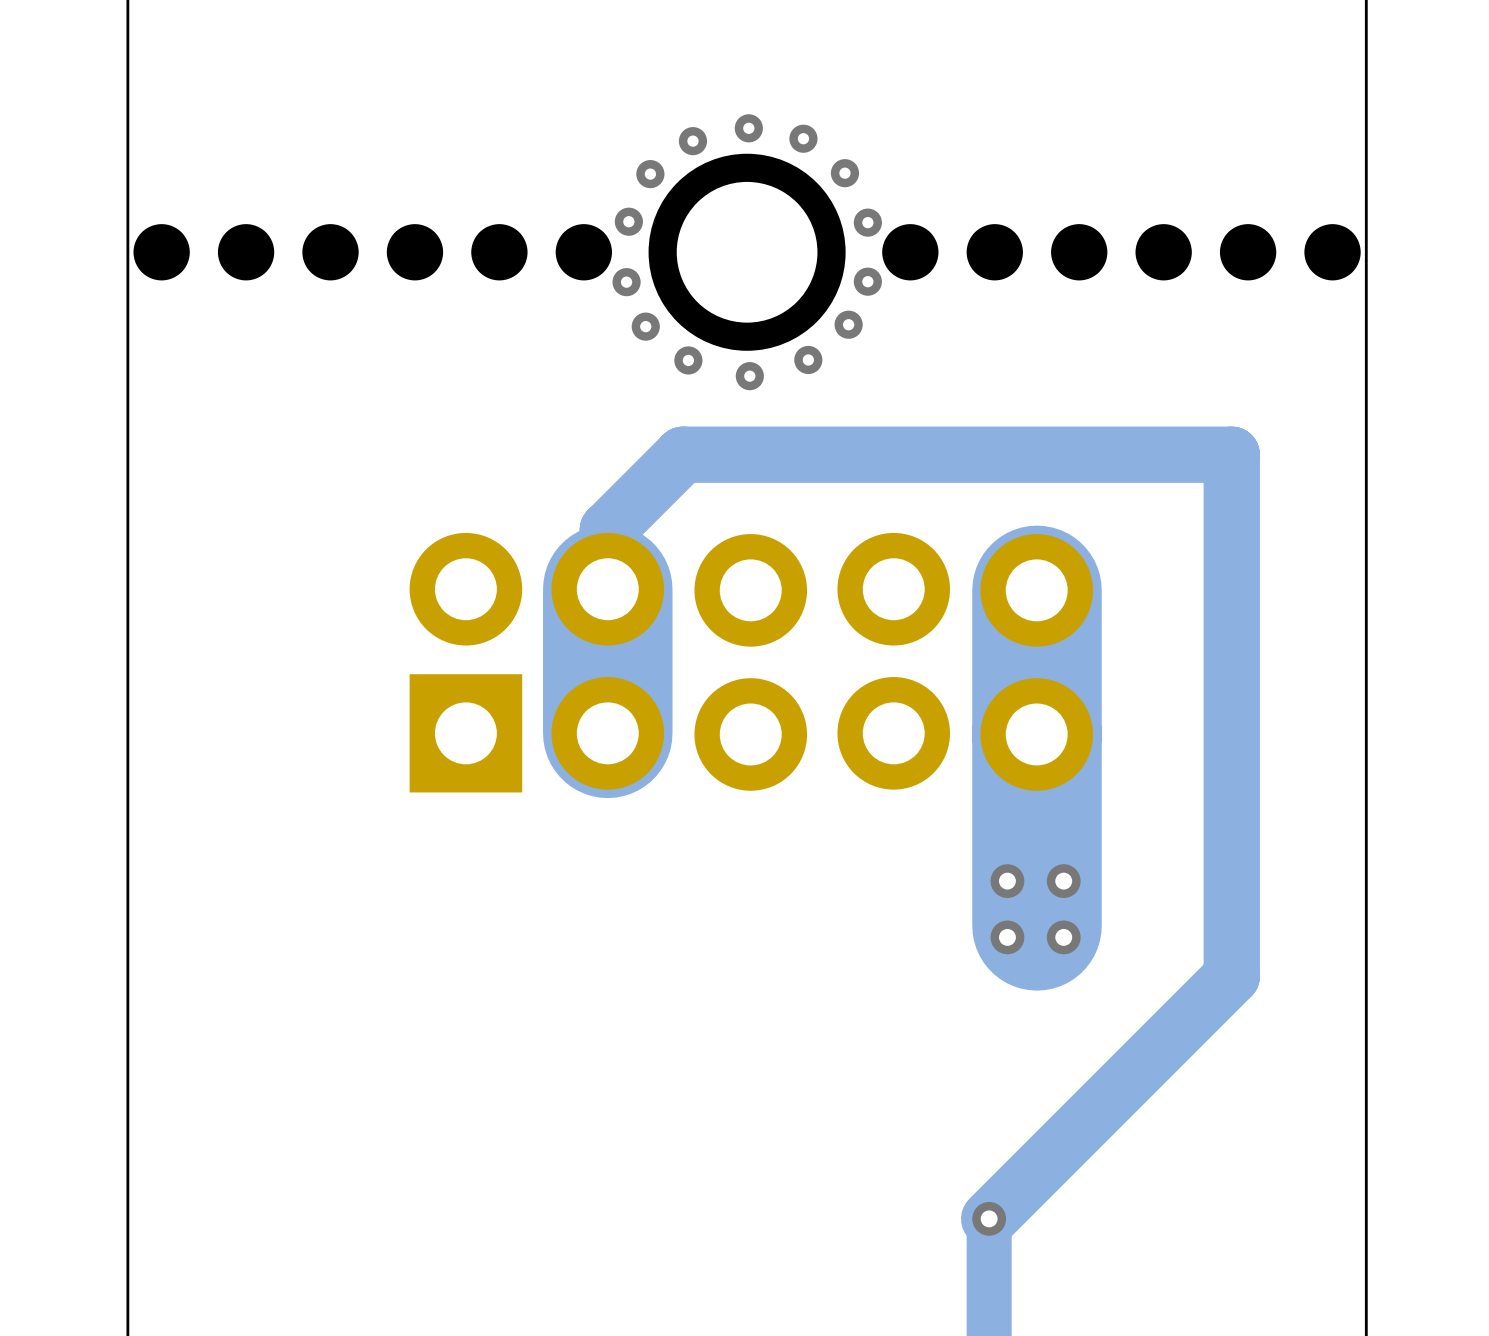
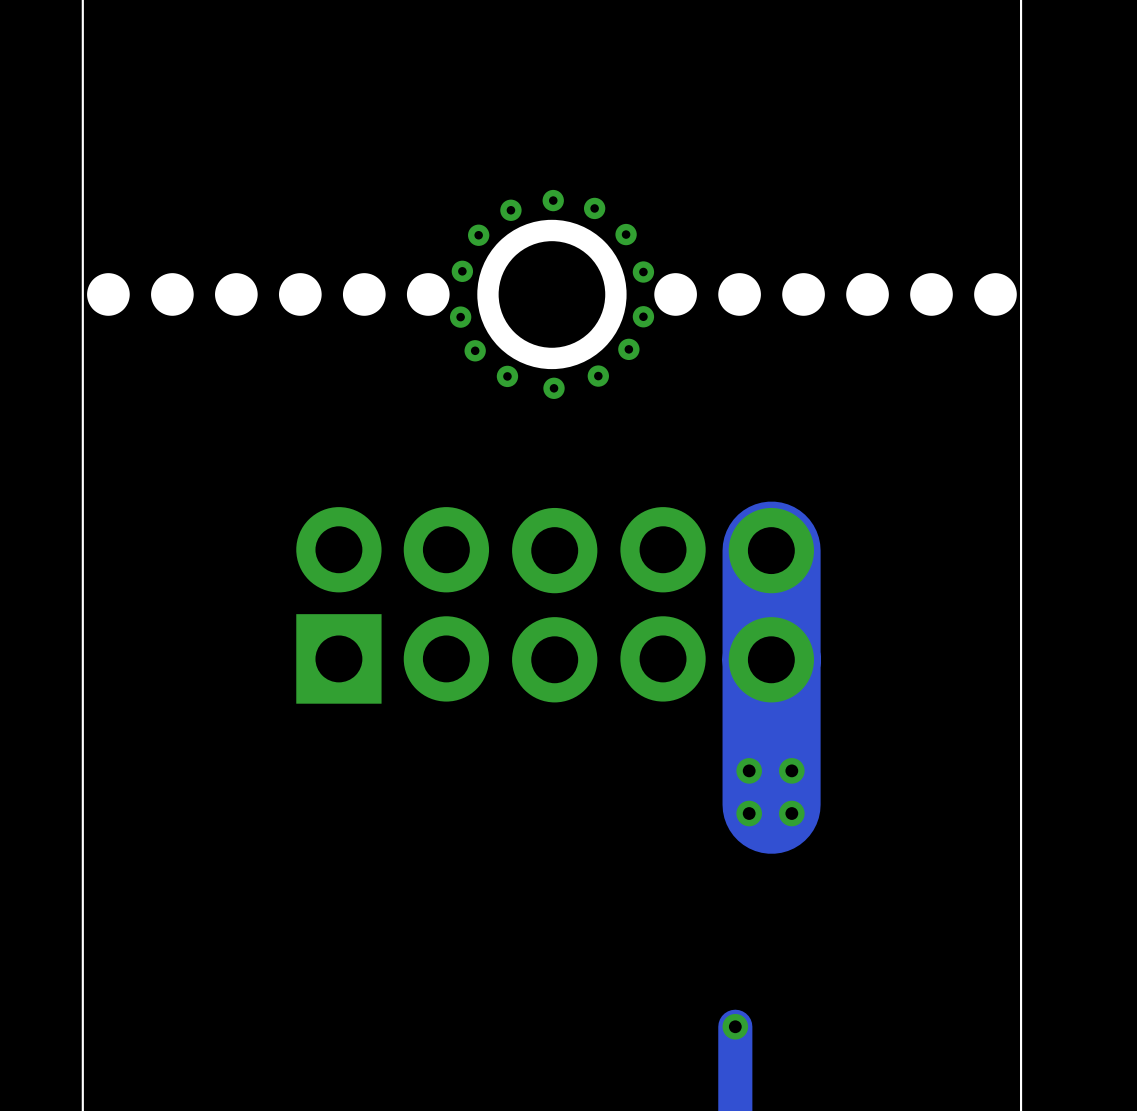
track: (607, 733) (607, 529) (682, 454) (1231, 454) (1231, 976) (989, 1218) -> none

